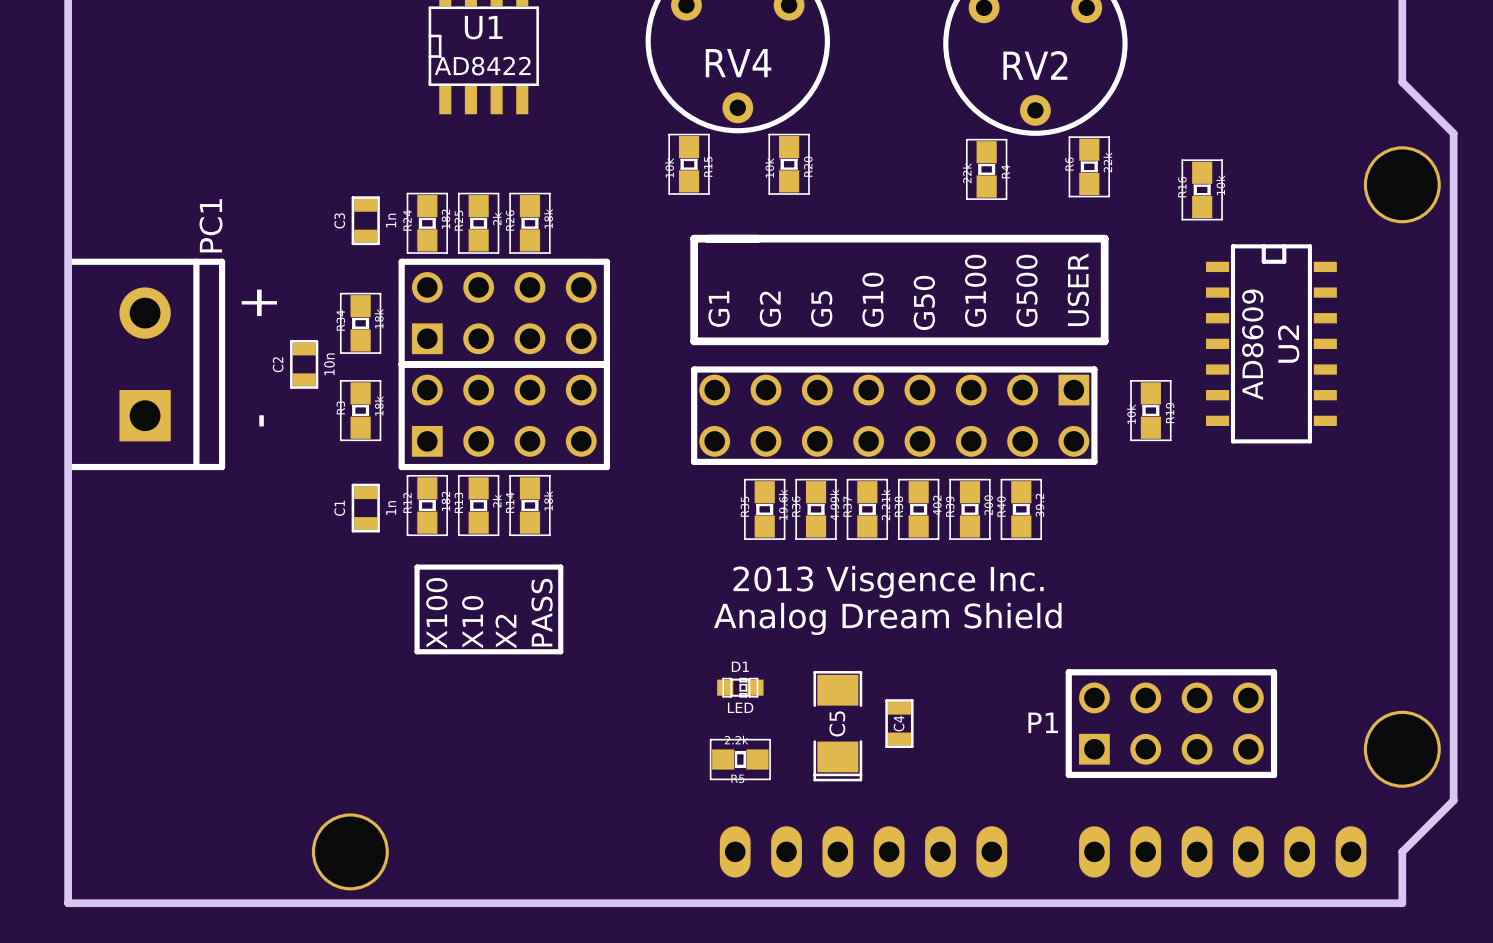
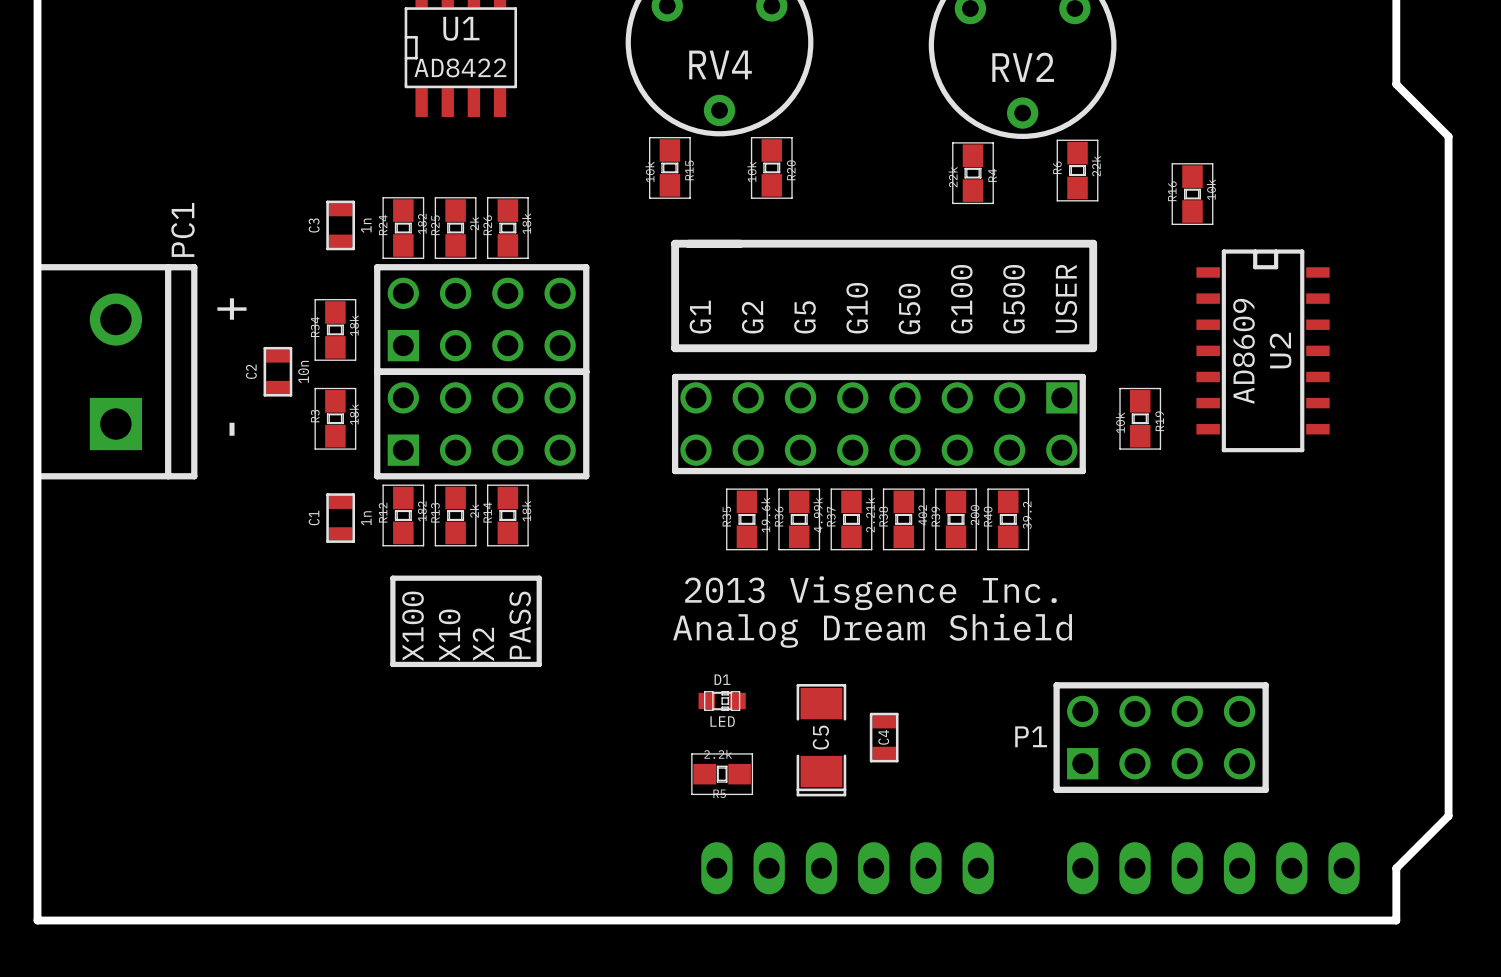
part: (1402, 184) -> none
part: (1402, 749) -> none
part: (350, 851) -> none

